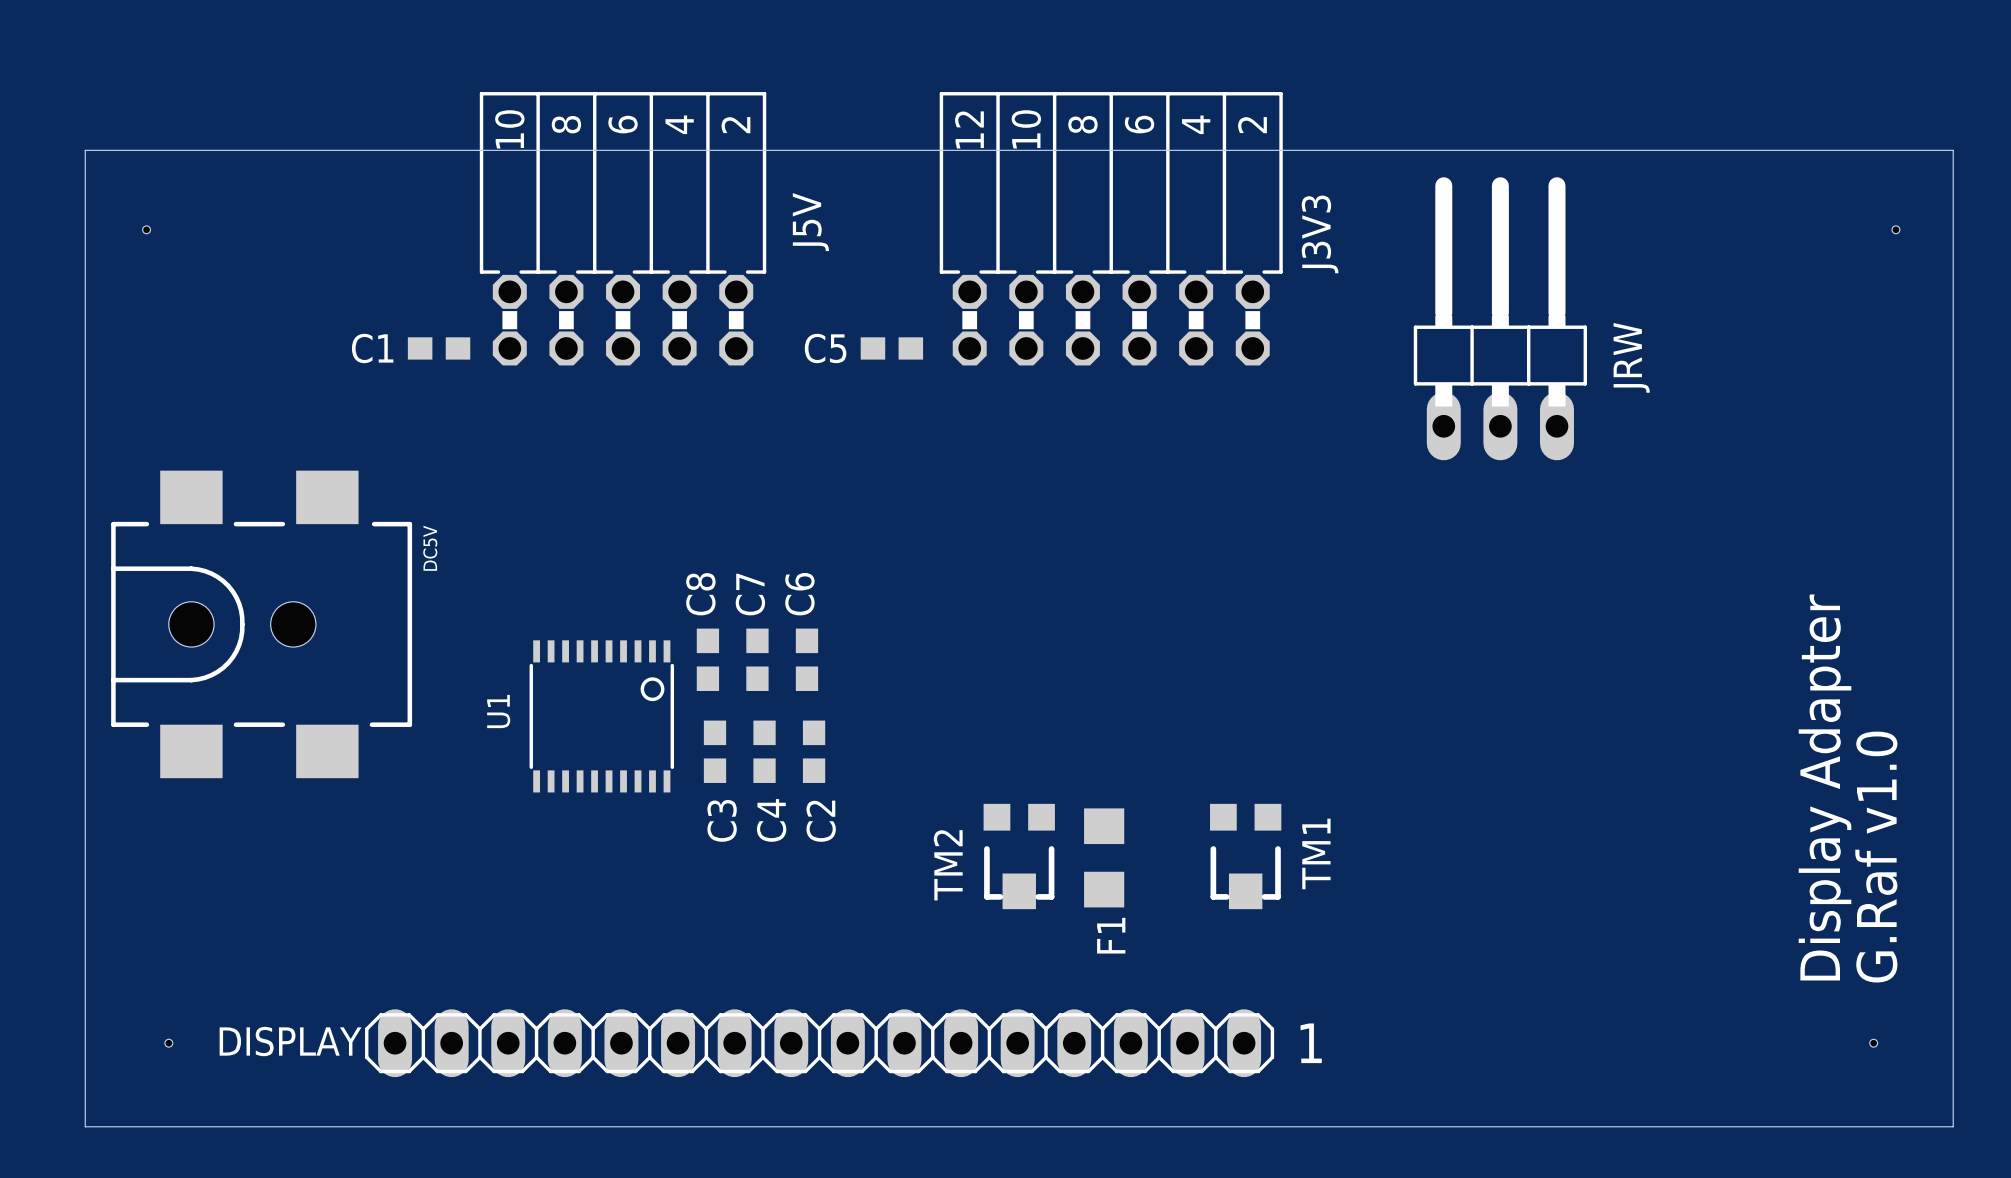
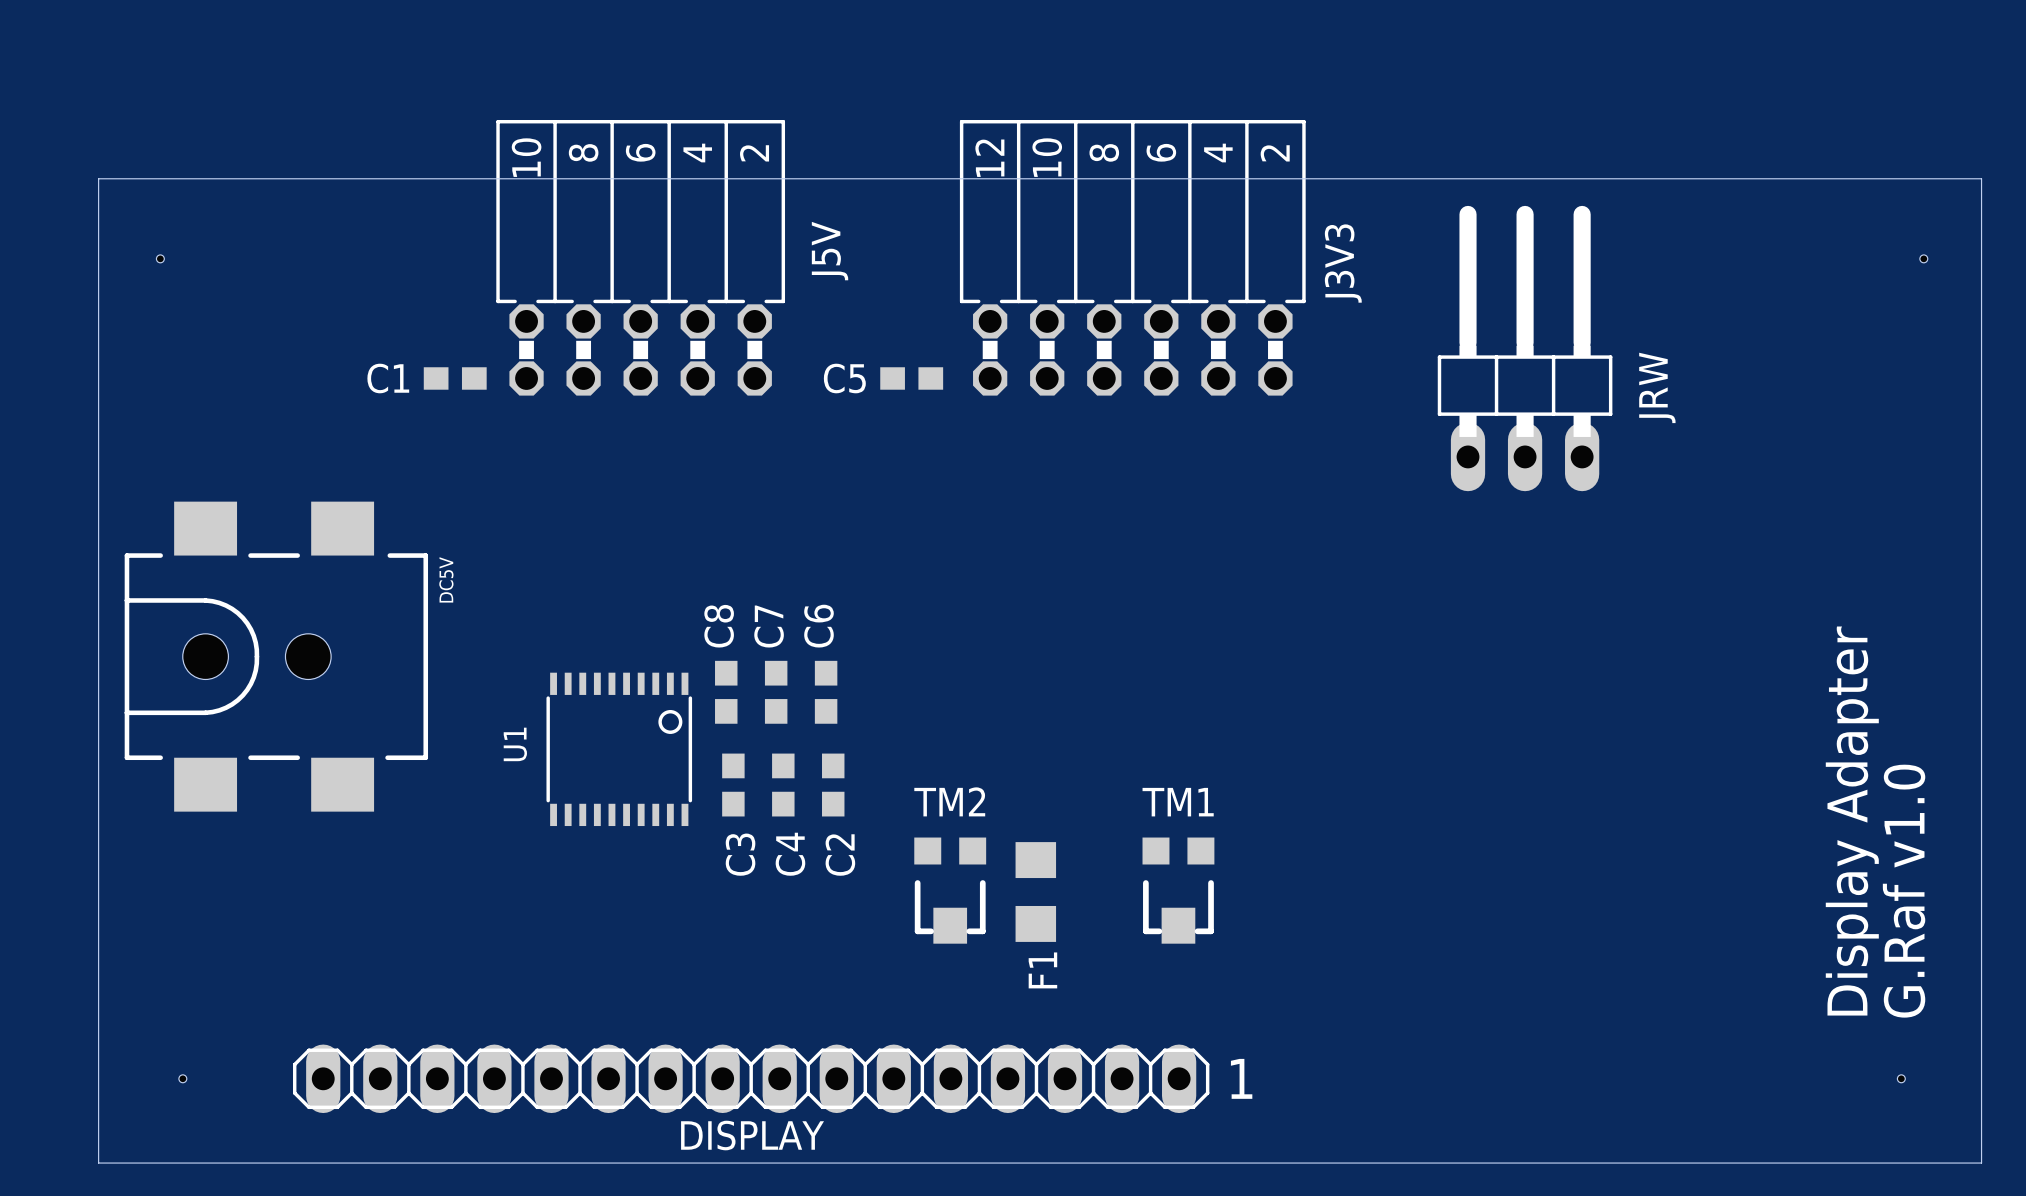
TM1 name rotation: 0° (1316, 853) -> 90° clockwise (1178, 802)
TM1 name position: TM1 (1316, 853) -> TM1 (1178, 802)
TM2 position: (1019, 856) -> (950, 890)
TM1 position: (1245, 856) -> (1178, 890)
F1 position: (1104, 857) -> (1035, 892)
TM2 name rotation: 0° (948, 865) -> 90° clockwise (949, 801)
DISPLAY name position: DISPLAY (290, 1041) -> DISPLAY (752, 1135)
DISPLAY position: (819, 1043) -> (751, 1078)
text position: 1 (1311, 1043) -> 1 (1241, 1078)

